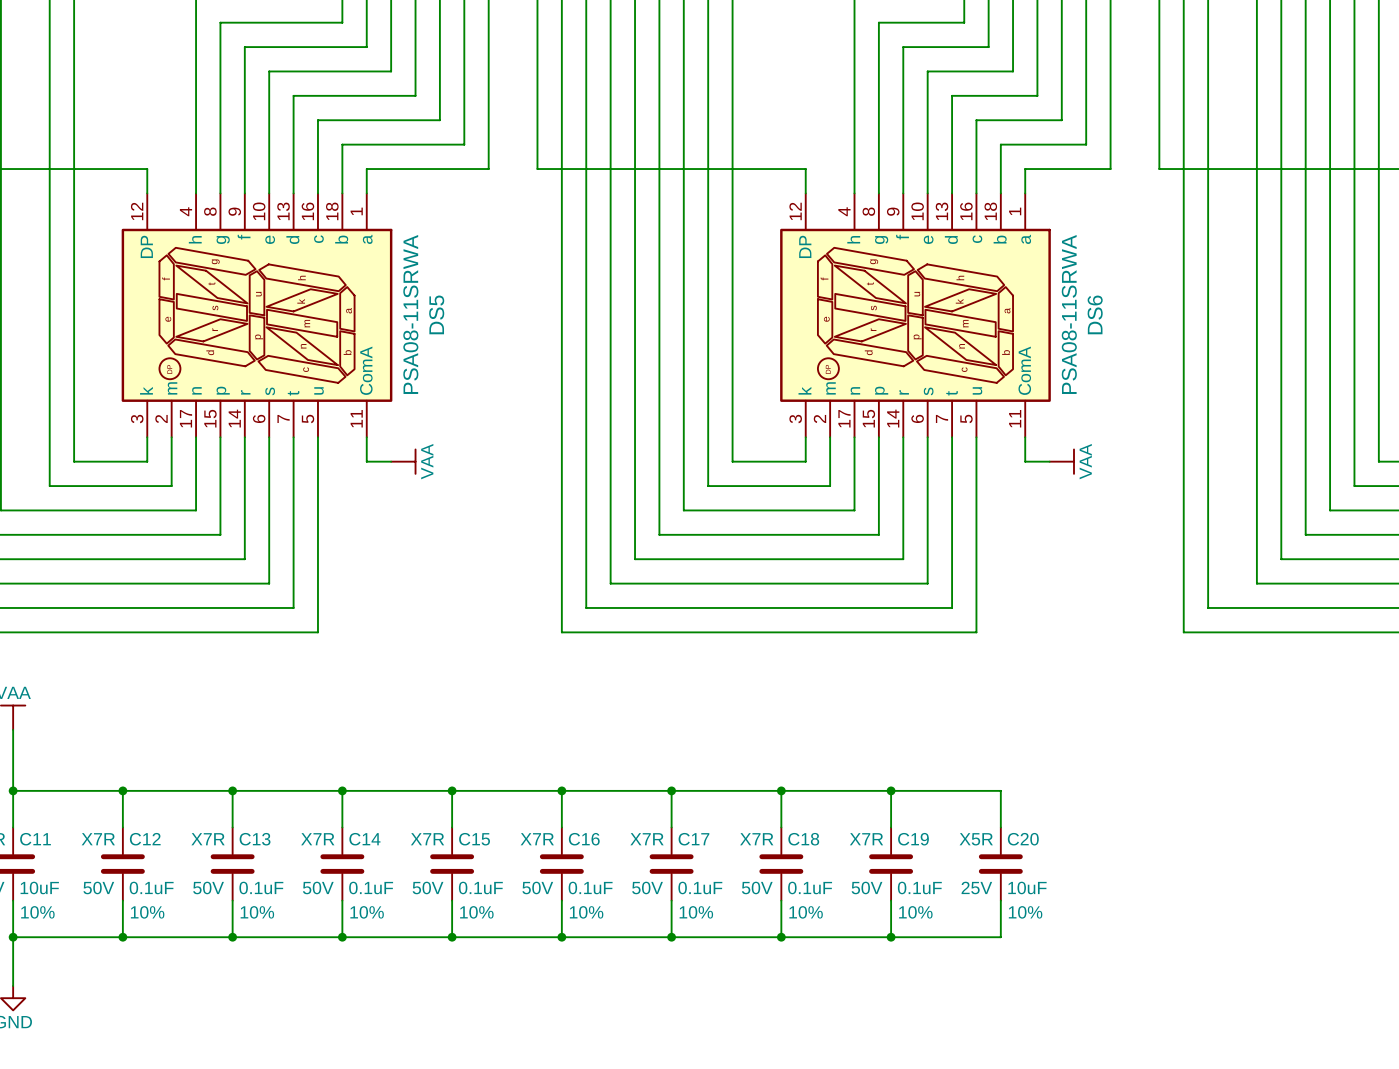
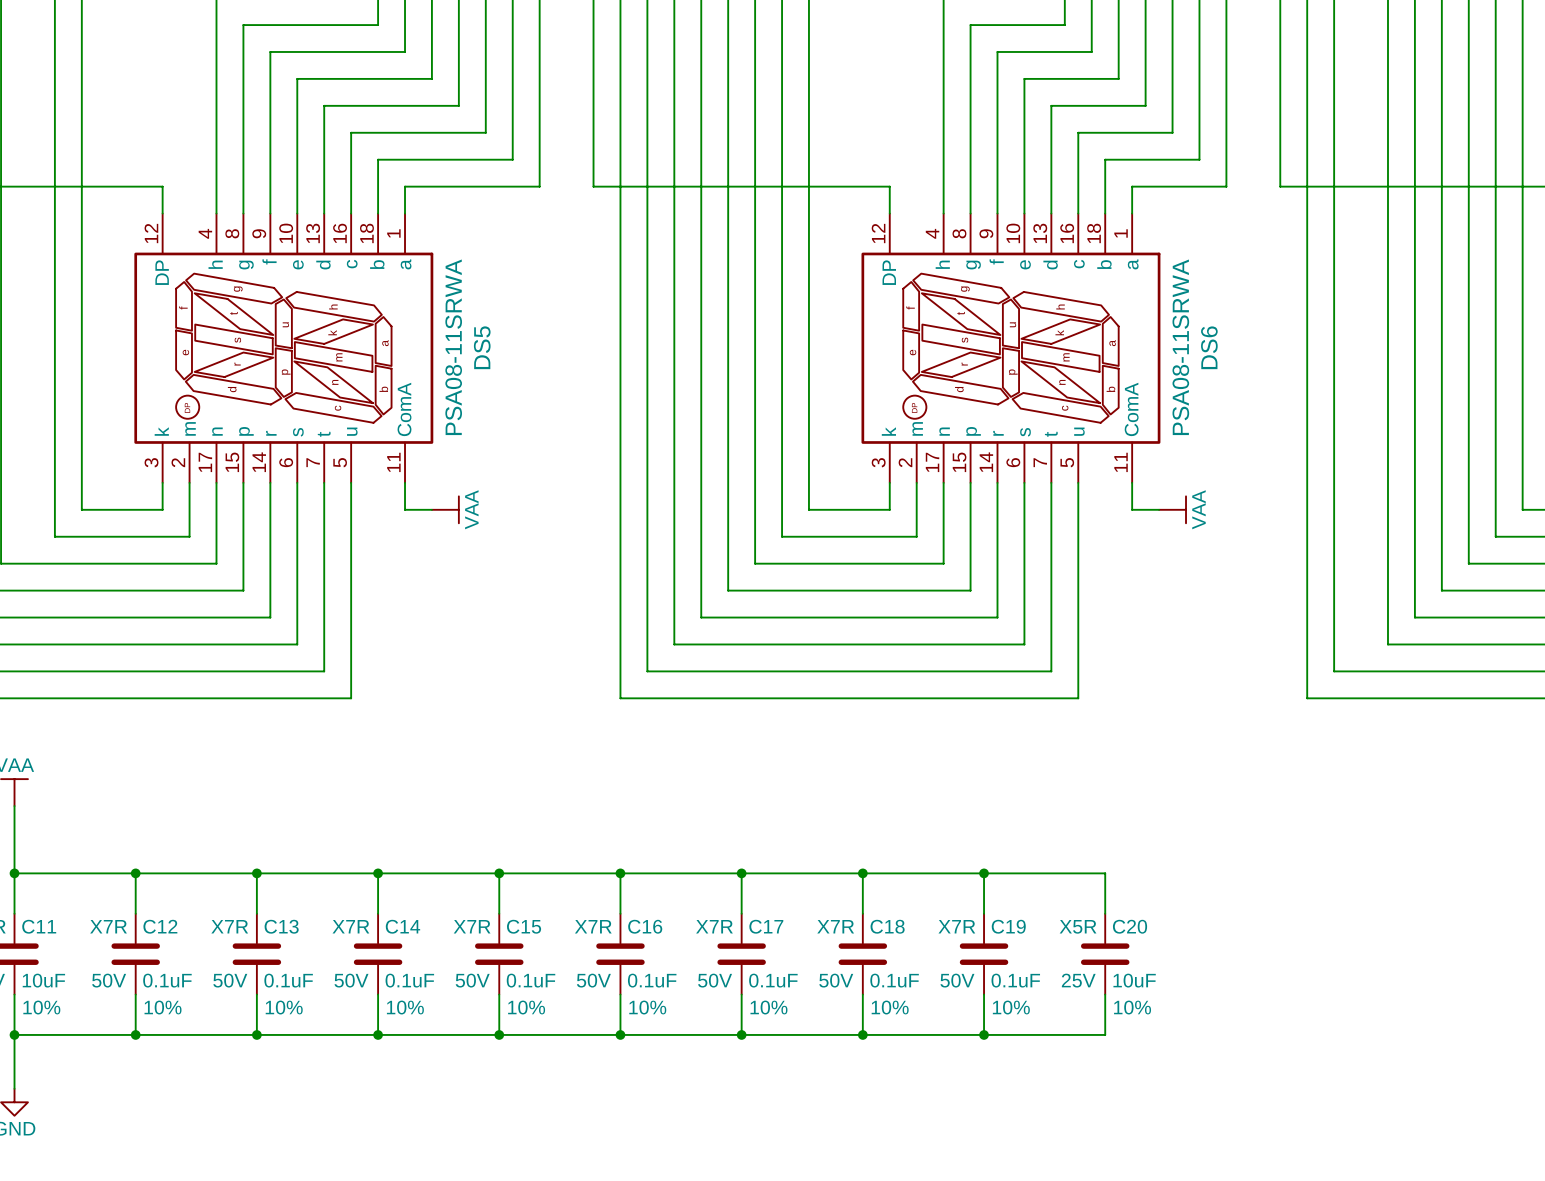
DS5 symbol: [121, 193, 393, 438] -> [134, 213, 434, 483]
DS6 symbol: [780, 193, 1051, 438] -> [861, 213, 1161, 483]

